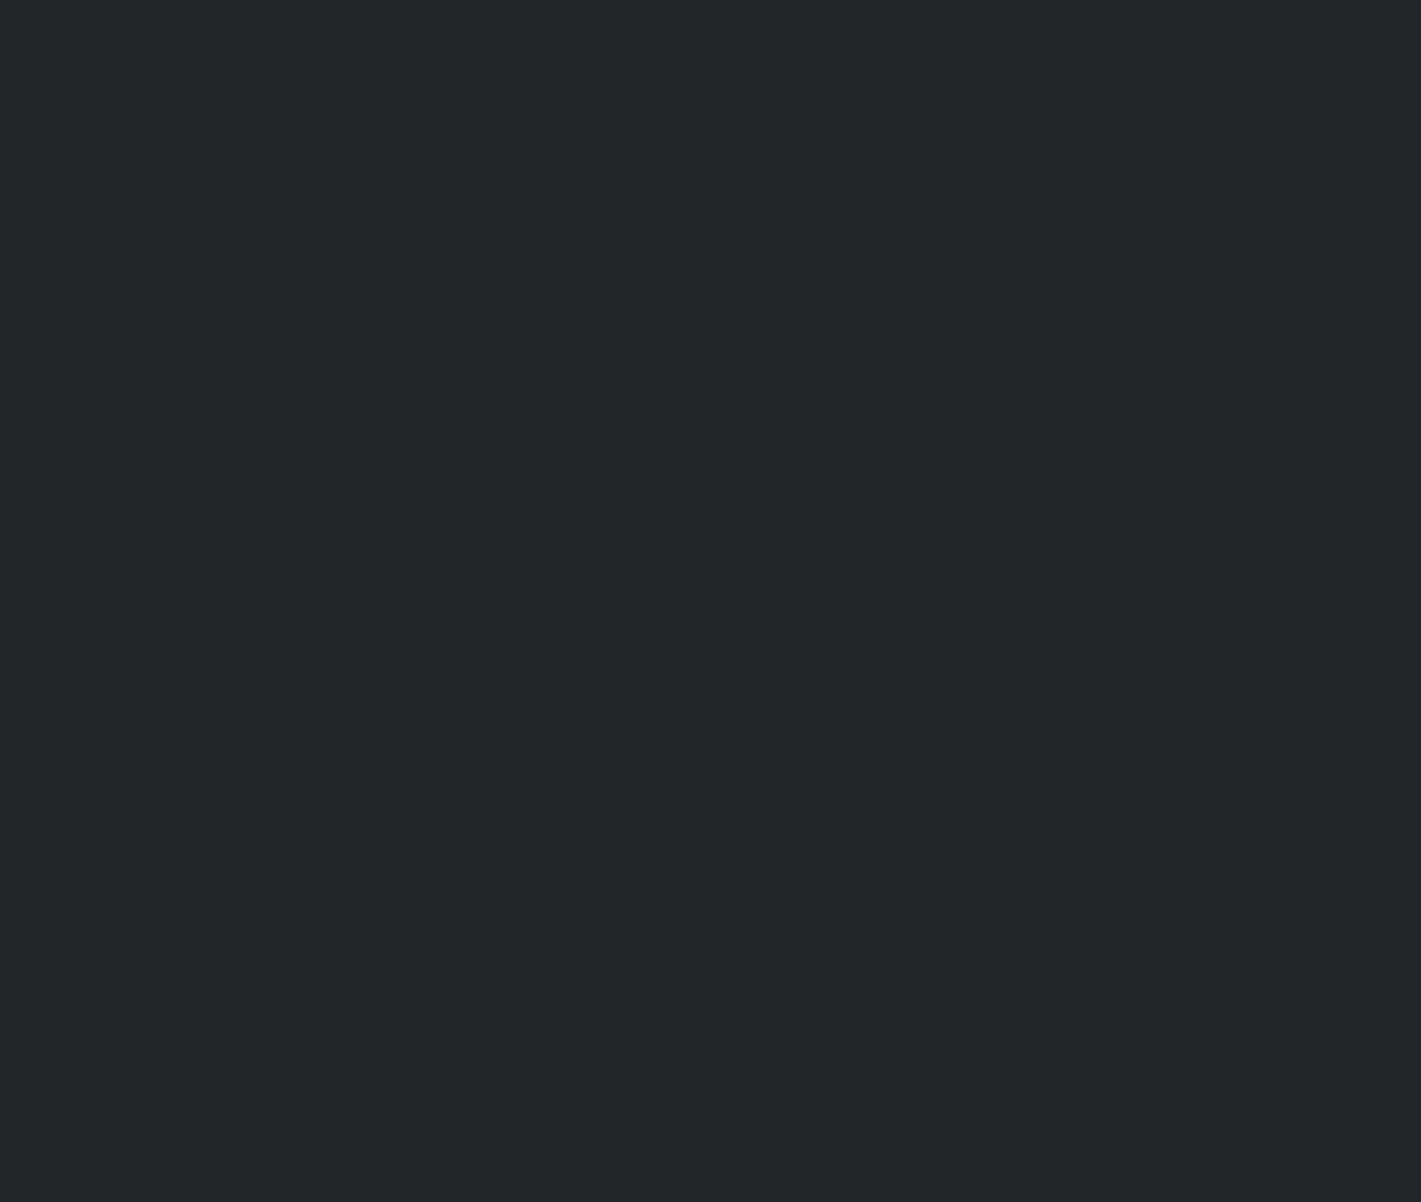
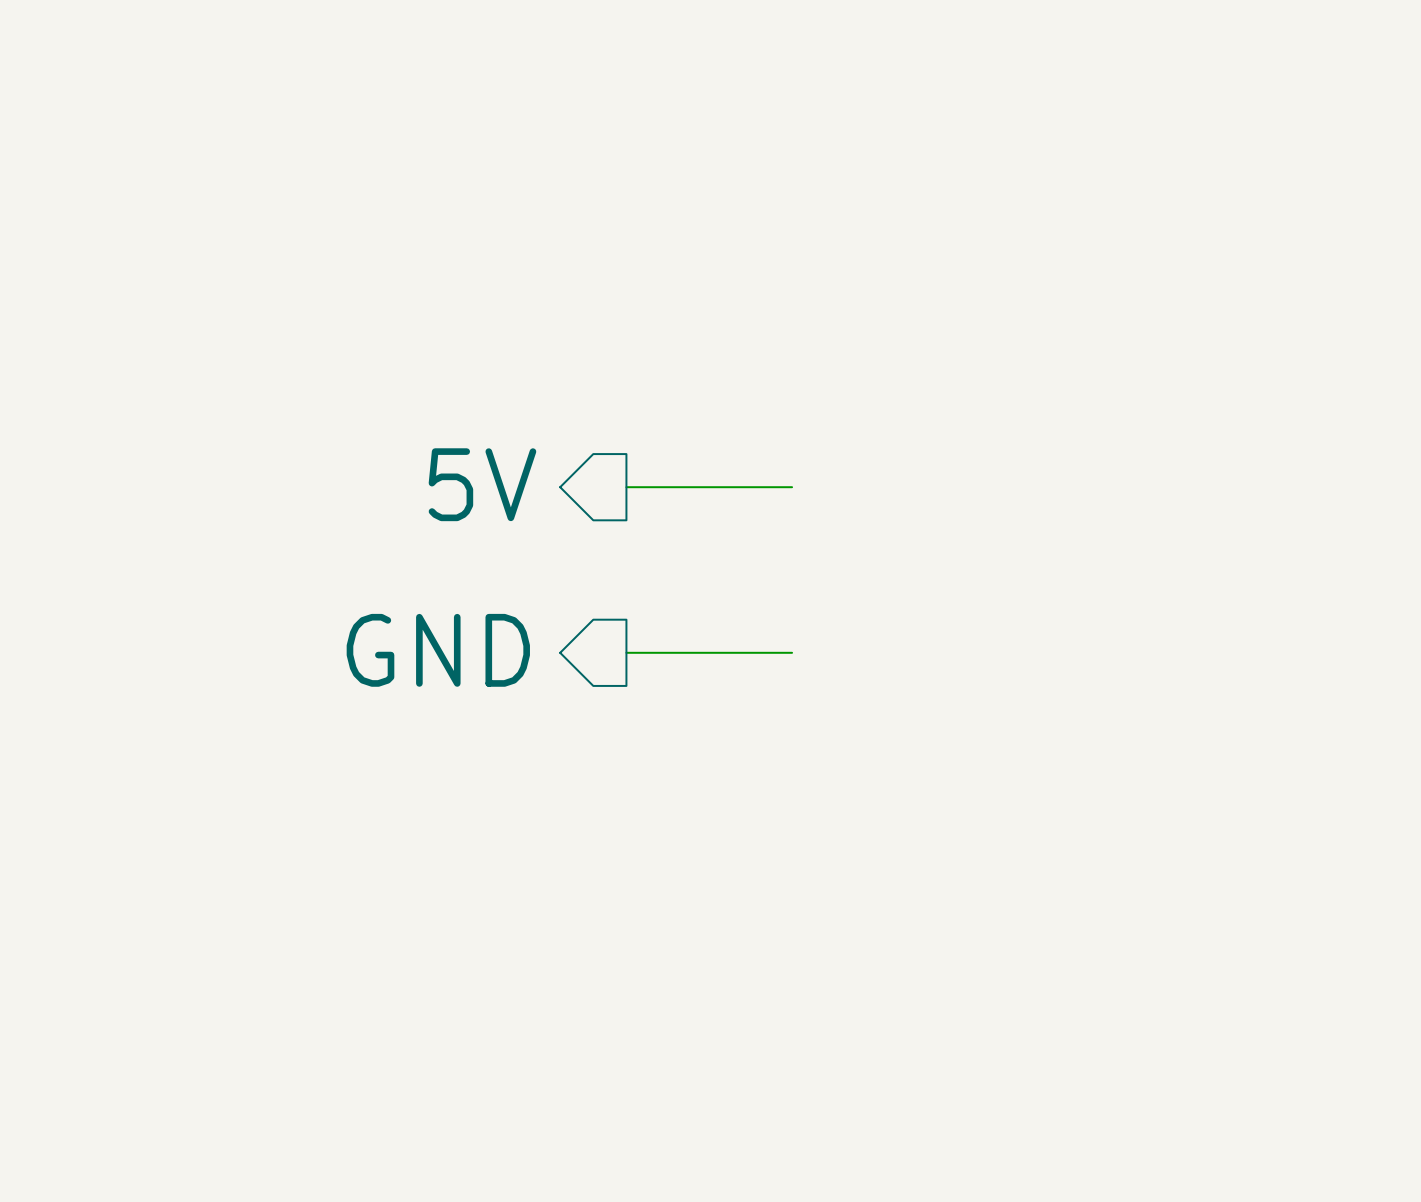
sheet pin: none -> 5V (482, 484)
wire: none -> (626, 487) (792, 487)
sheet pin: none -> GND (438, 650)
wire: none -> (626, 652) (792, 652)

